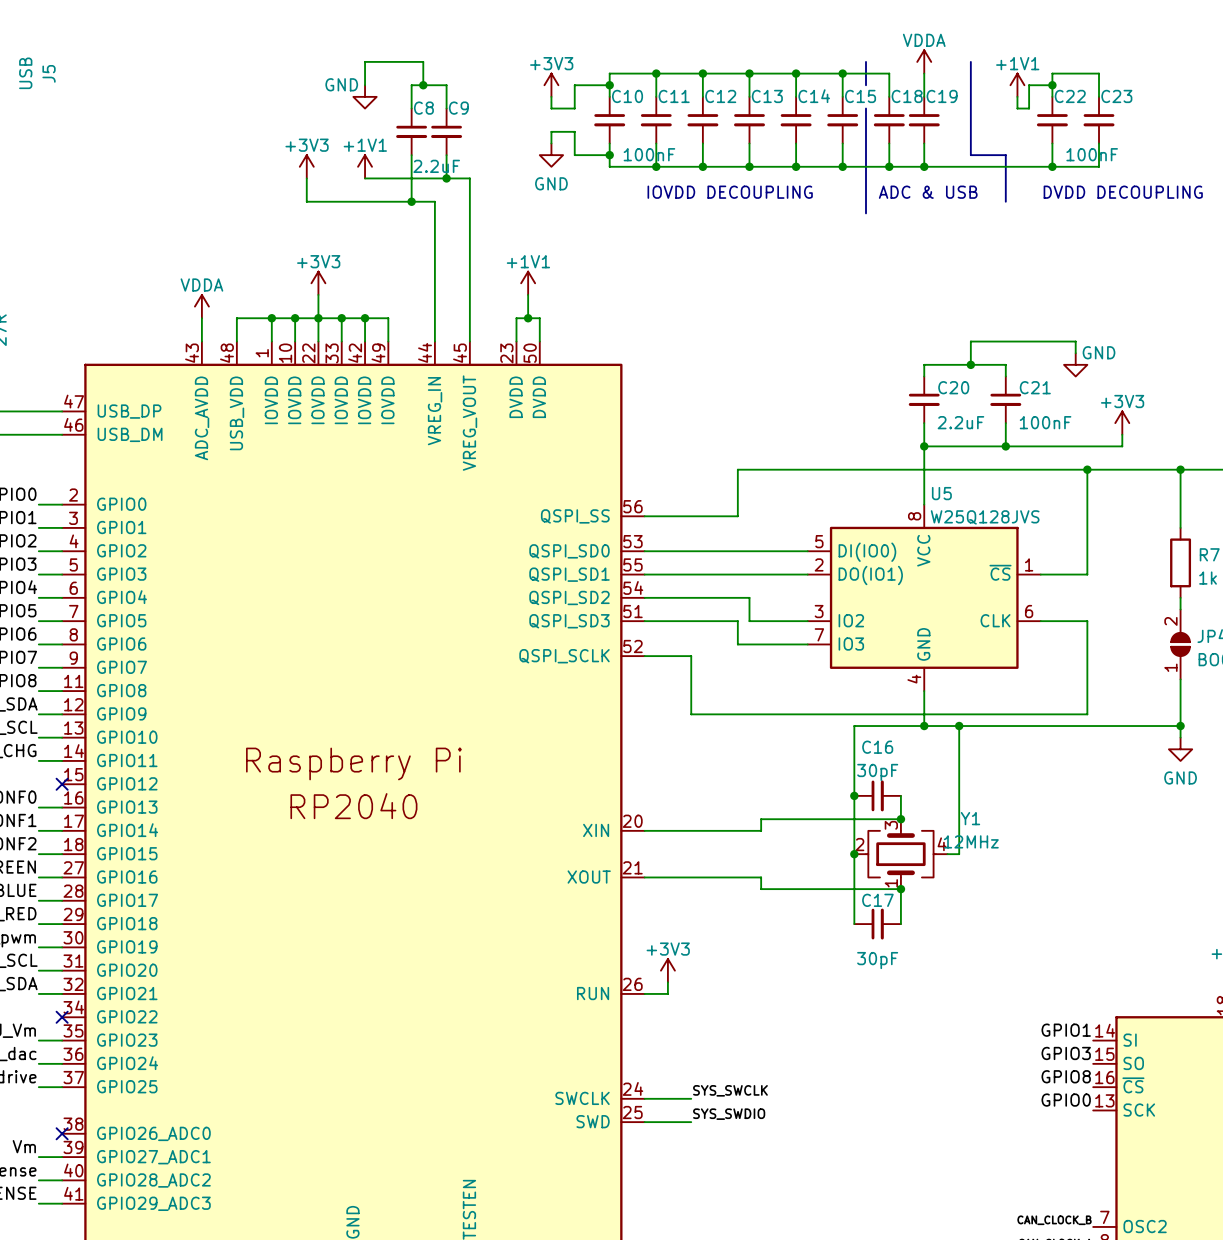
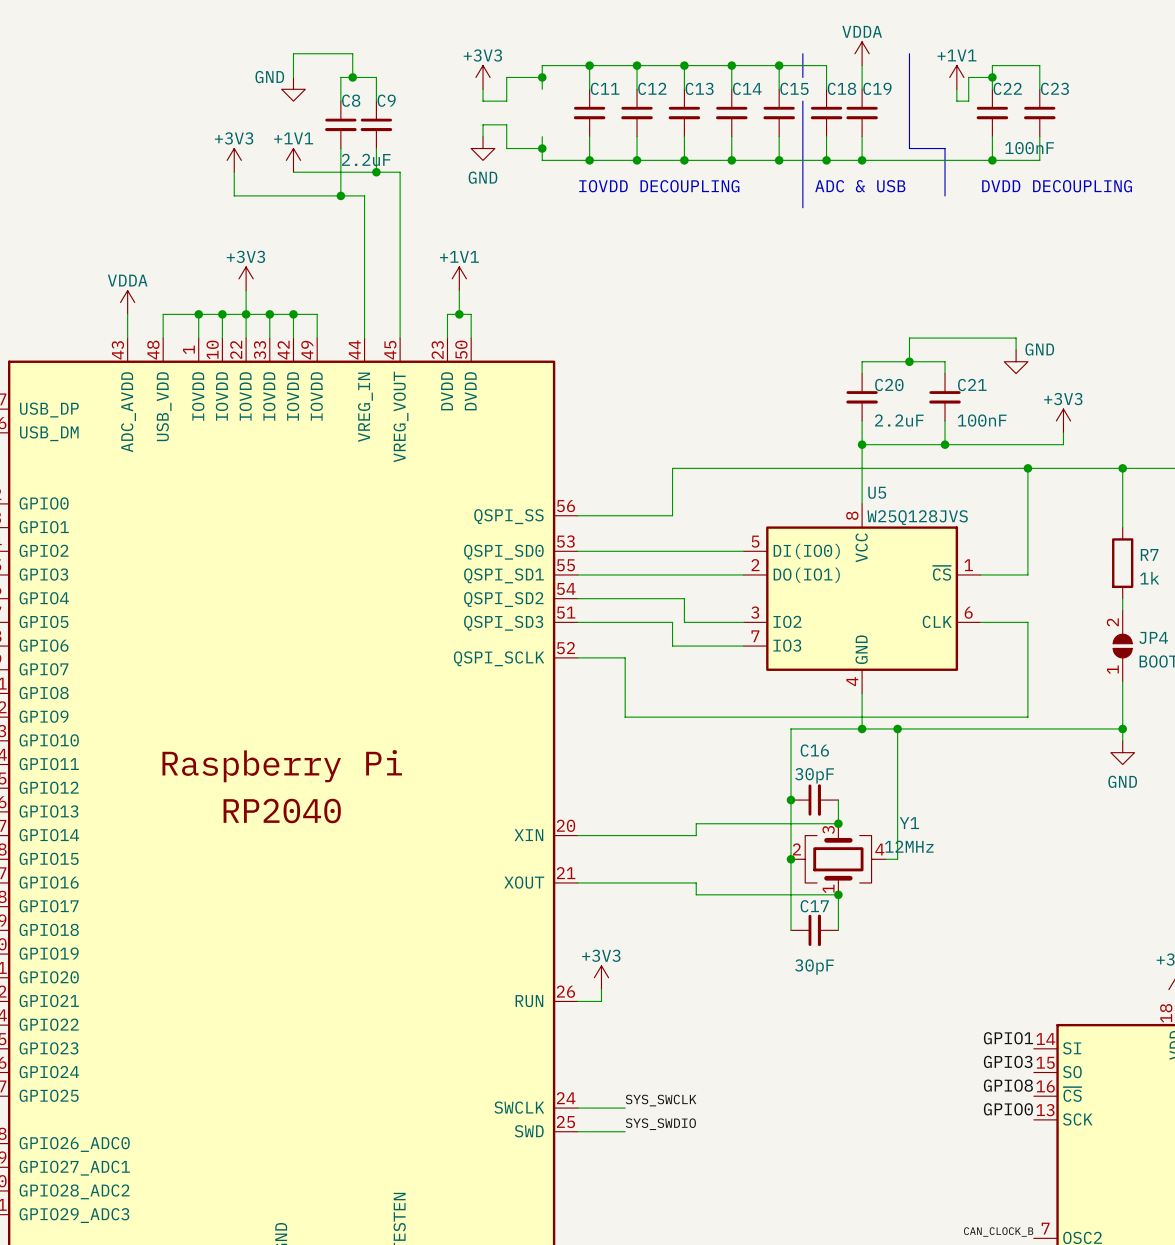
C10: 100nF (609, 120) -> none

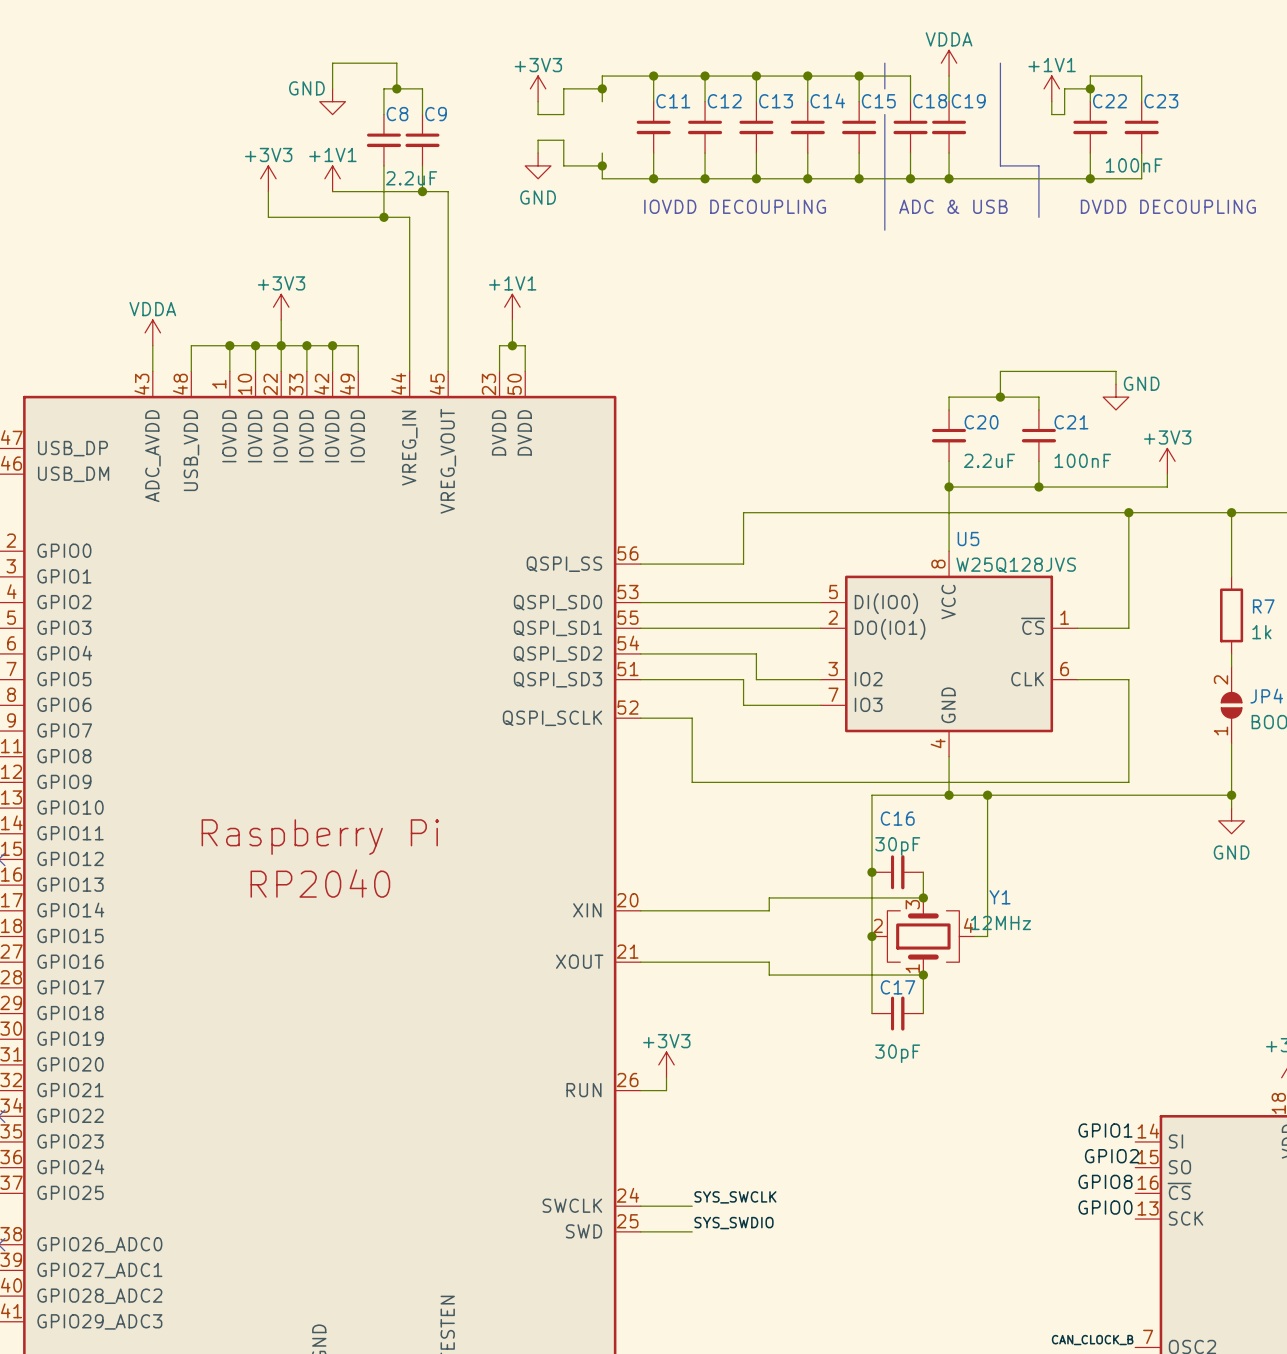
label: GPIO3 (1008, 1061) -> GPIO2 (1111, 1156)

